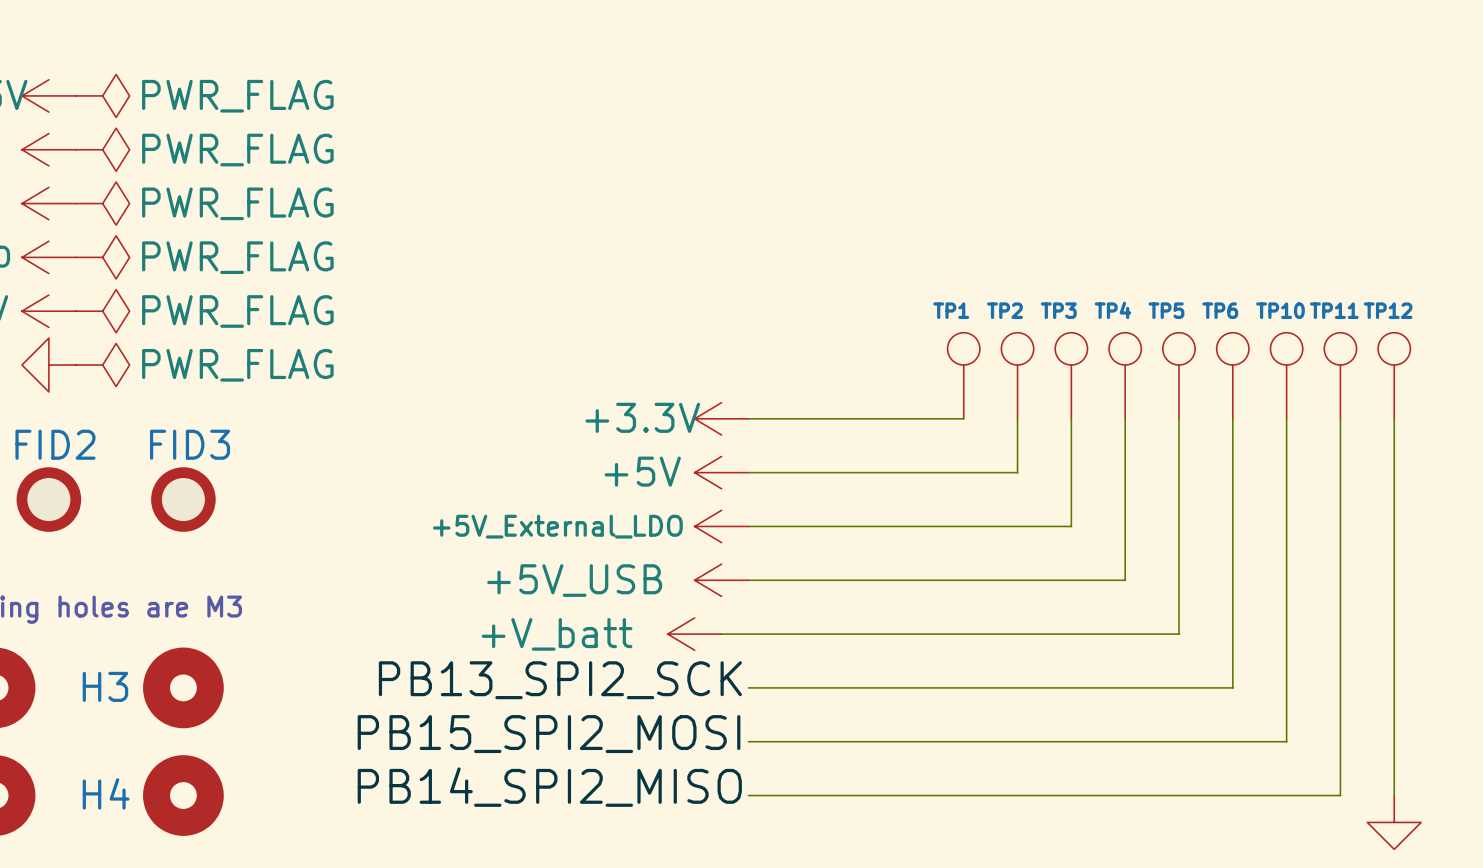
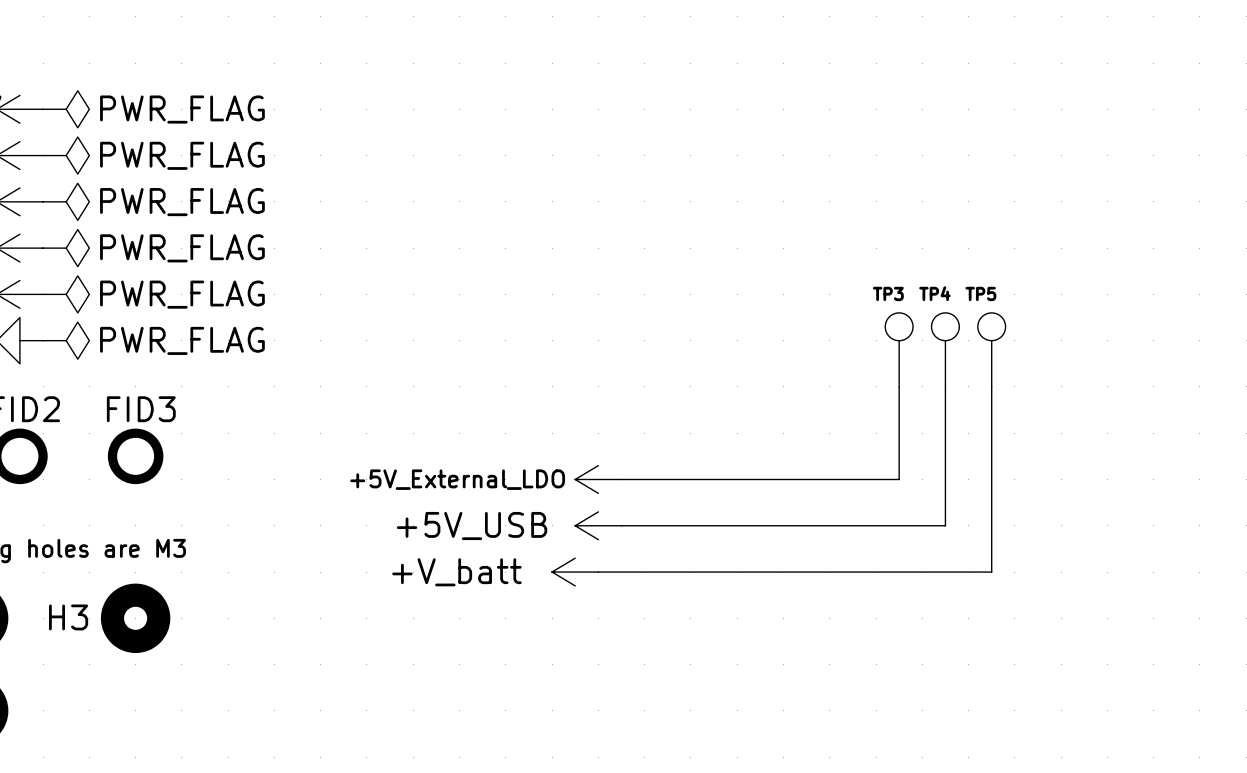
TP1: (963, 375) -> none
TP2: (1017, 375) -> none
TP6: (1232, 375) -> none
TP10: (1286, 375) -> none
TP11: (1340, 375) -> none
TP12: (1394, 375) -> none
power symbol: +3.3V (721, 418) -> none
wire: (748, 418) (963, 418) -> none
wire: (1017, 418) (1017, 472) (748, 472) -> none
wire: (1232, 418) (1232, 687) (748, 687) -> none
wire: (1286, 418) (1286, 741) (748, 741) -> none
wire: (1340, 418) (1340, 795) (748, 795) -> none
wire: (1394, 418) (1394, 795) -> none
power symbol: +5V (721, 472) -> none
label: PB13_SPI2_SCK (560, 680) -> none
label: PB15_SPI2_MOSI (549, 734) -> none
label: PB14_SPI2_MISO (549, 787) -> none
H4: (183, 795) -> none
power symbol: (1394, 822) -> none

